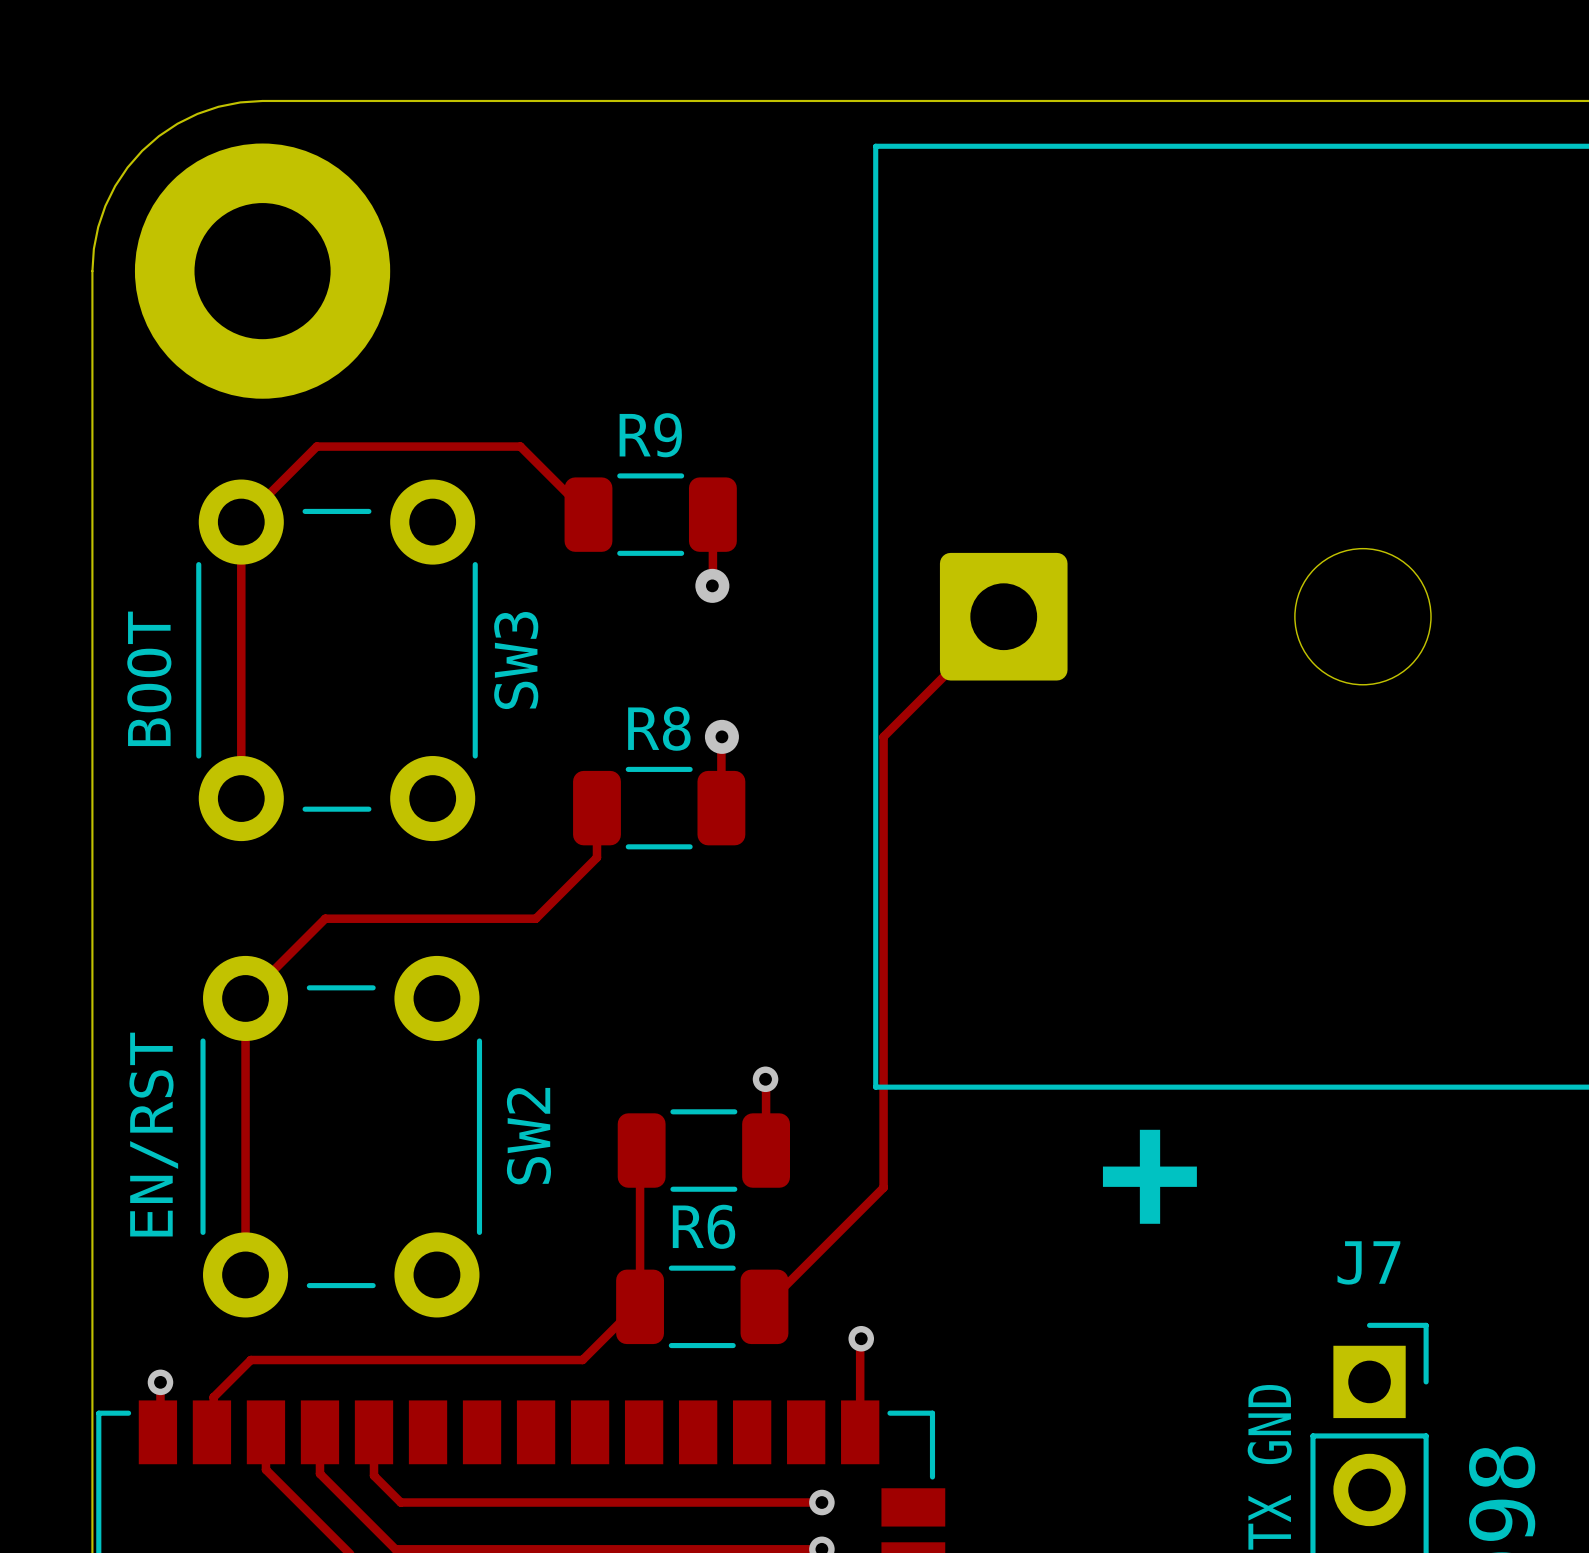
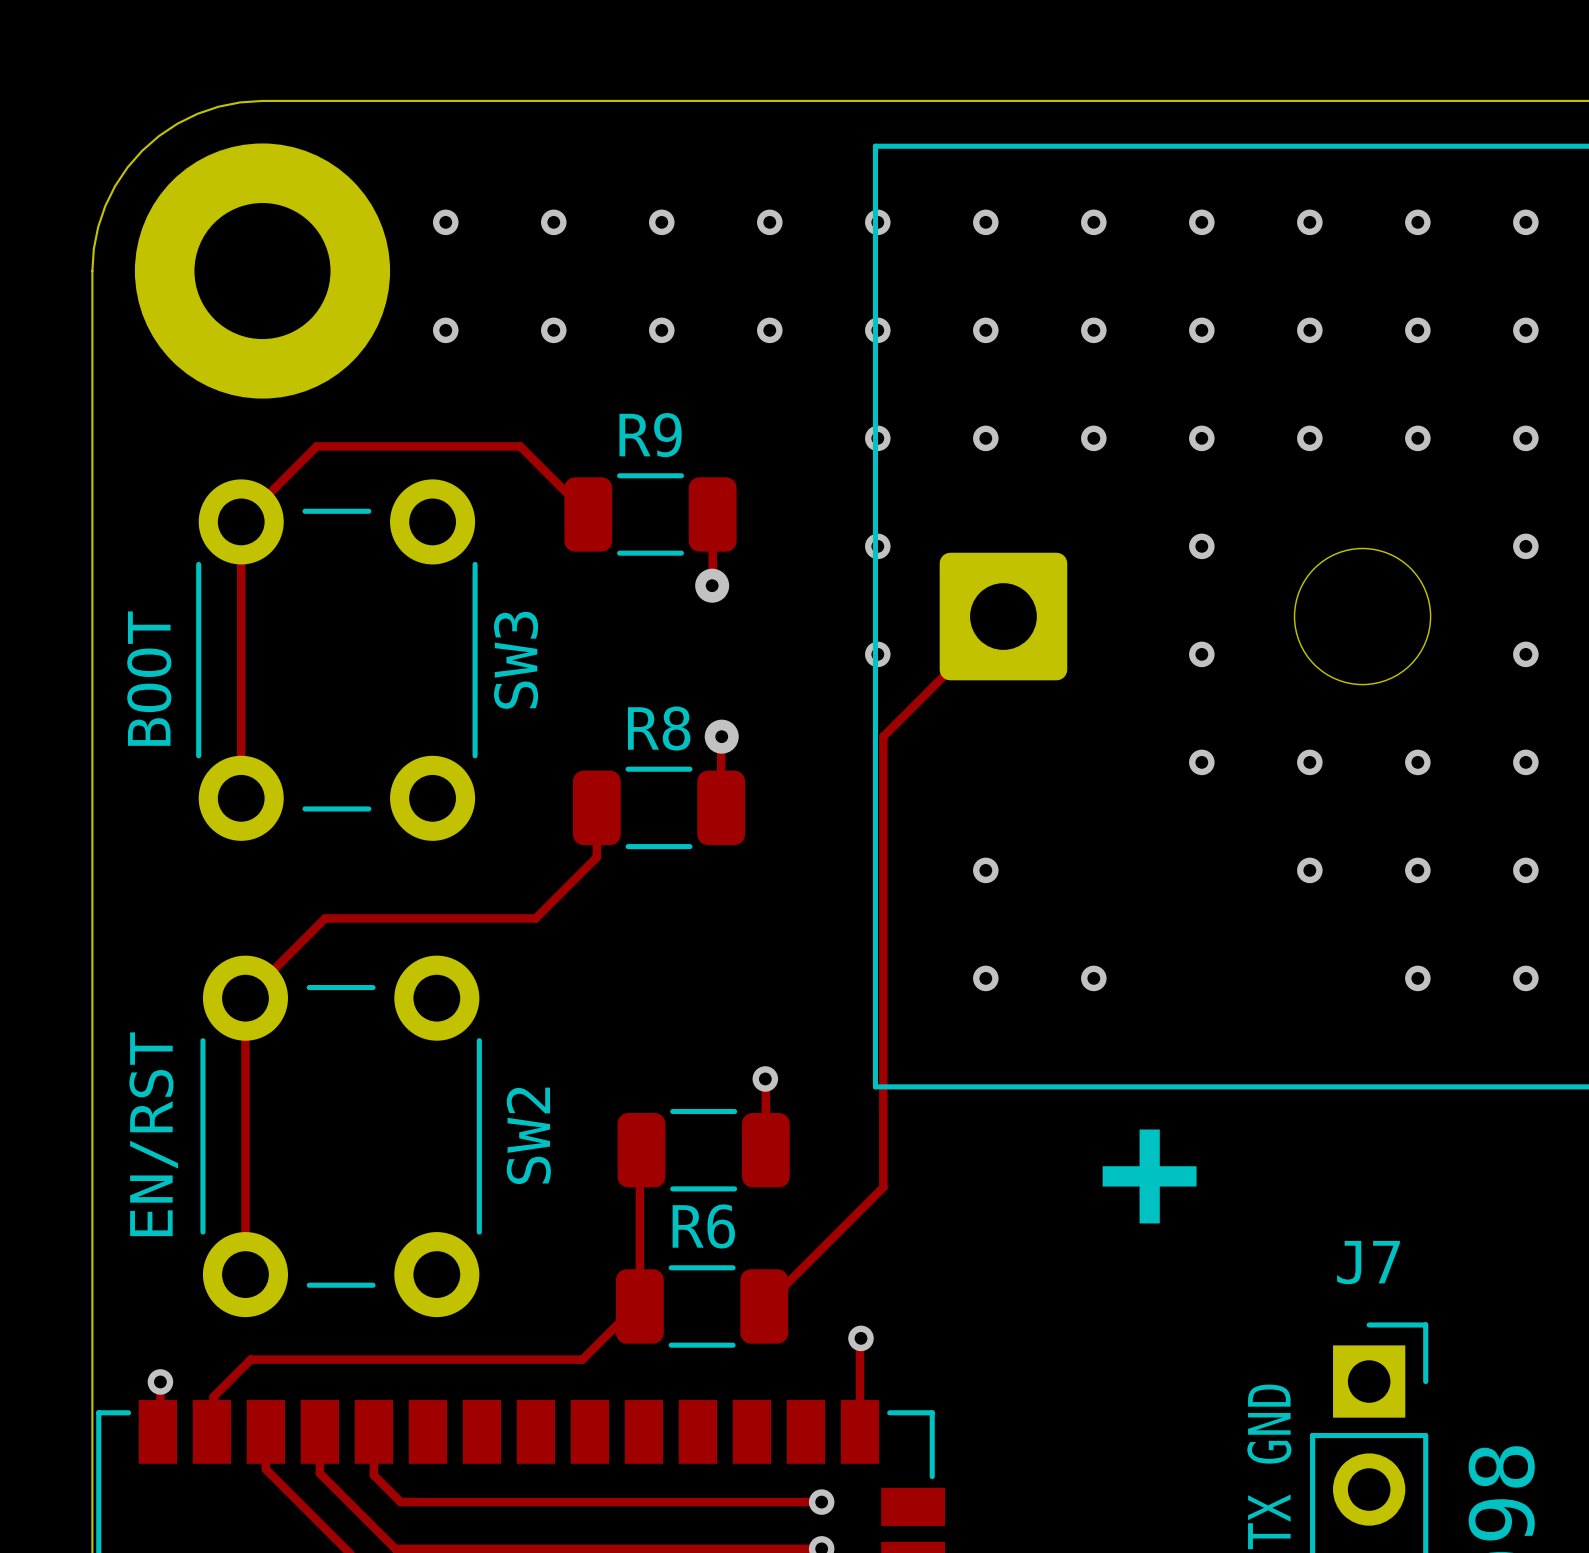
via: none -> (445, 222)
via: none -> (553, 222)
via: none -> (661, 222)
via: none -> (769, 222)
via: none -> (877, 222)
via: none -> (985, 222)
via: none -> (1093, 222)
via: none -> (1201, 222)
via: none -> (1309, 222)
via: none -> (1417, 222)
via: none -> (1525, 222)
via: none -> (445, 330)
via: none -> (553, 330)
via: none -> (661, 330)
via: none -> (769, 330)
via: none -> (877, 330)
via: none -> (985, 330)
via: none -> (1093, 330)
via: none -> (1201, 330)
via: none -> (1309, 330)
via: none -> (1417, 330)
via: none -> (1525, 330)
via: none -> (877, 438)
via: none -> (985, 438)
via: none -> (1093, 438)
via: none -> (1201, 438)
via: none -> (1309, 438)
via: none -> (1417, 438)
via: none -> (1525, 438)
via: none -> (877, 546)
via: none -> (1201, 546)
via: none -> (1525, 546)
via: none -> (877, 654)
via: none -> (1201, 654)
via: none -> (1525, 654)
via: none -> (1201, 762)
via: none -> (1309, 762)
via: none -> (1417, 762)
via: none -> (1525, 762)
via: none -> (985, 870)
via: none -> (1309, 870)
via: none -> (1417, 870)
via: none -> (1525, 870)
via: none -> (985, 978)
via: none -> (1093, 978)
via: none -> (1417, 978)
via: none -> (1525, 978)

